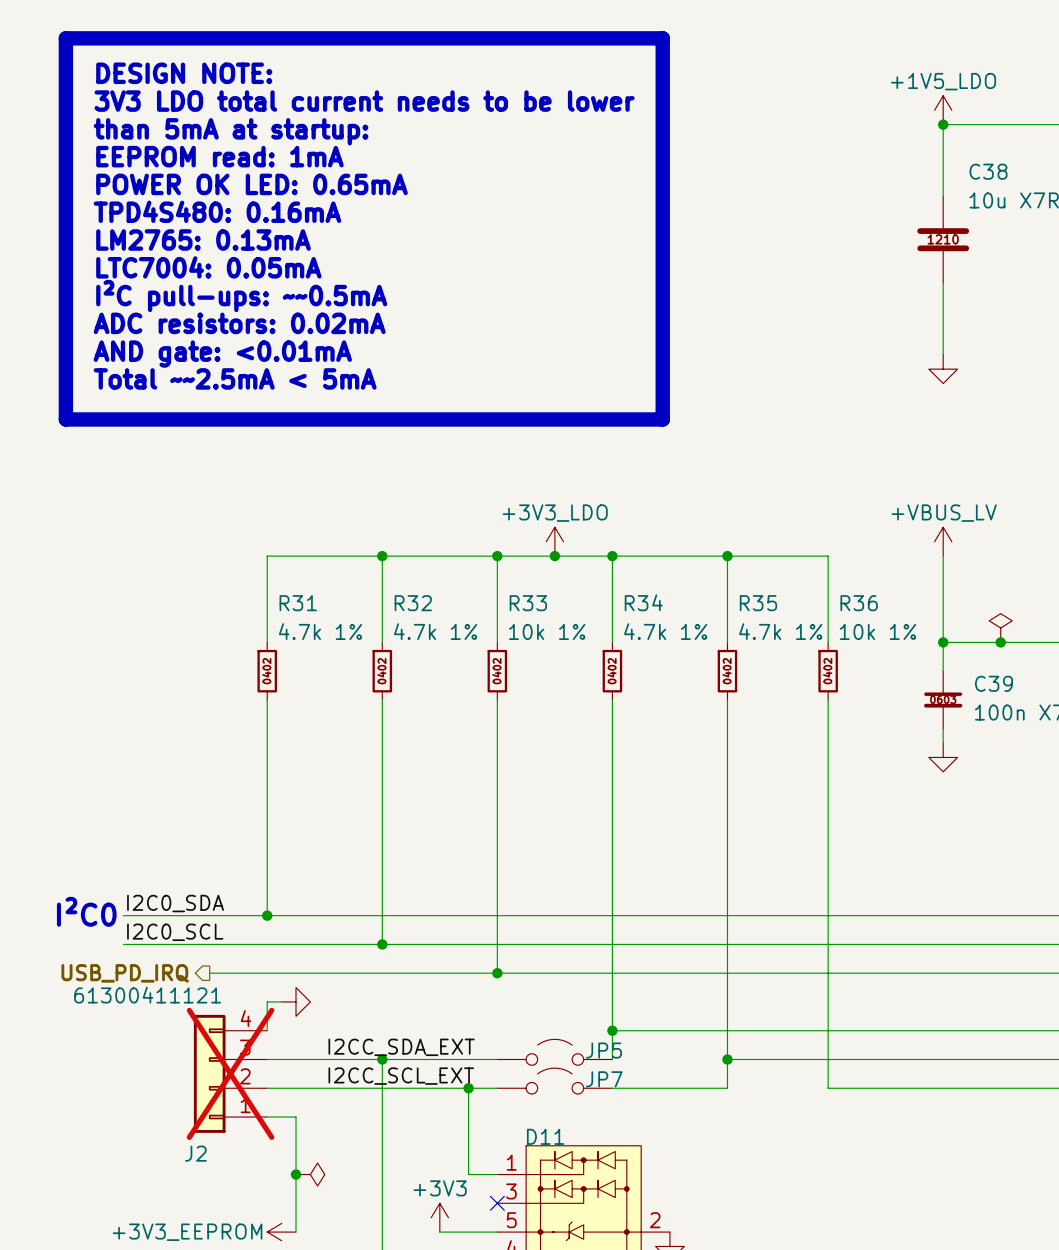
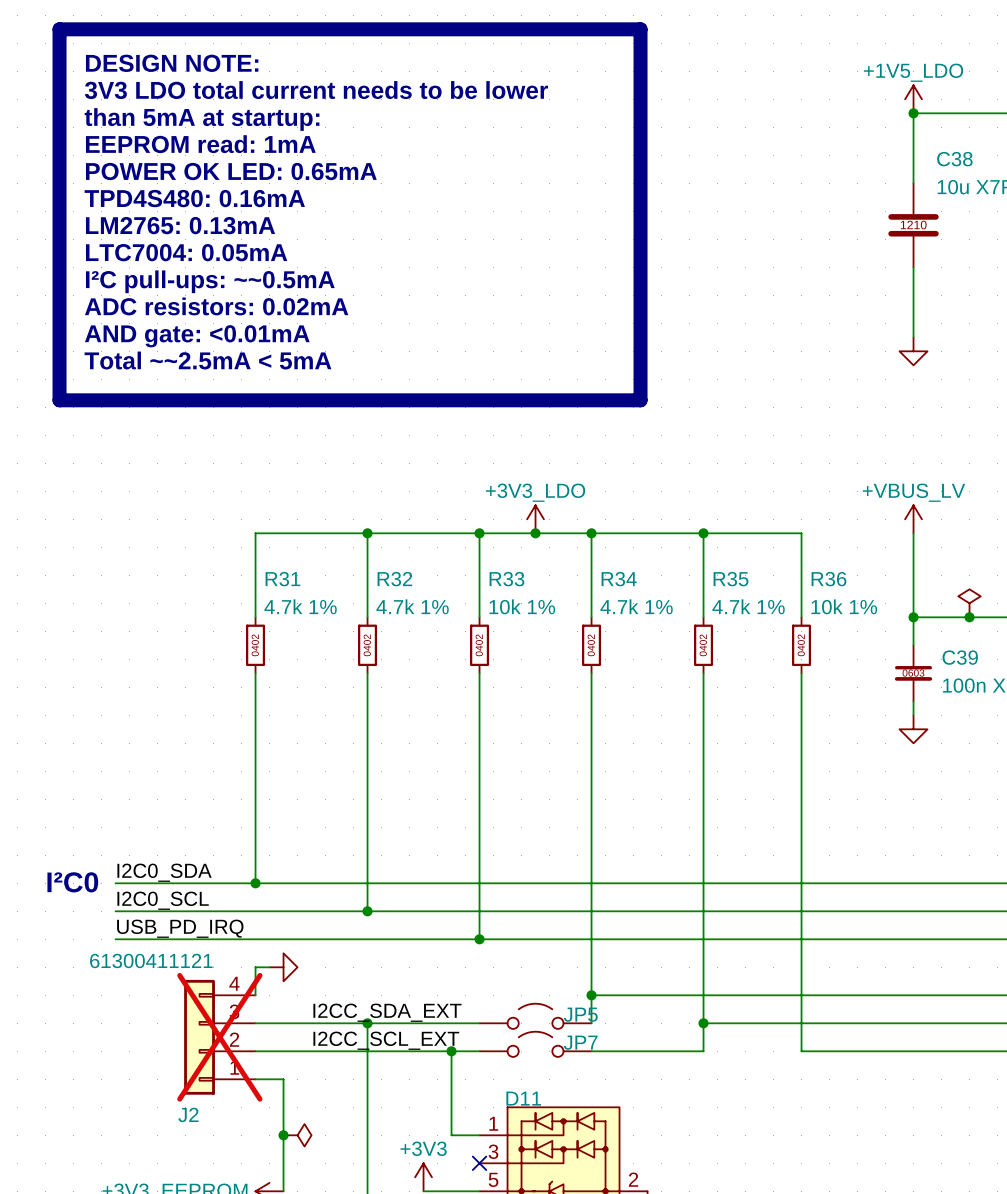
label: none -> USB_PD_IRQ (180, 928)
wire: none -> (115, 939) (199, 939)
hierarchical label: USB_PD_IRQ (125, 973) -> none

